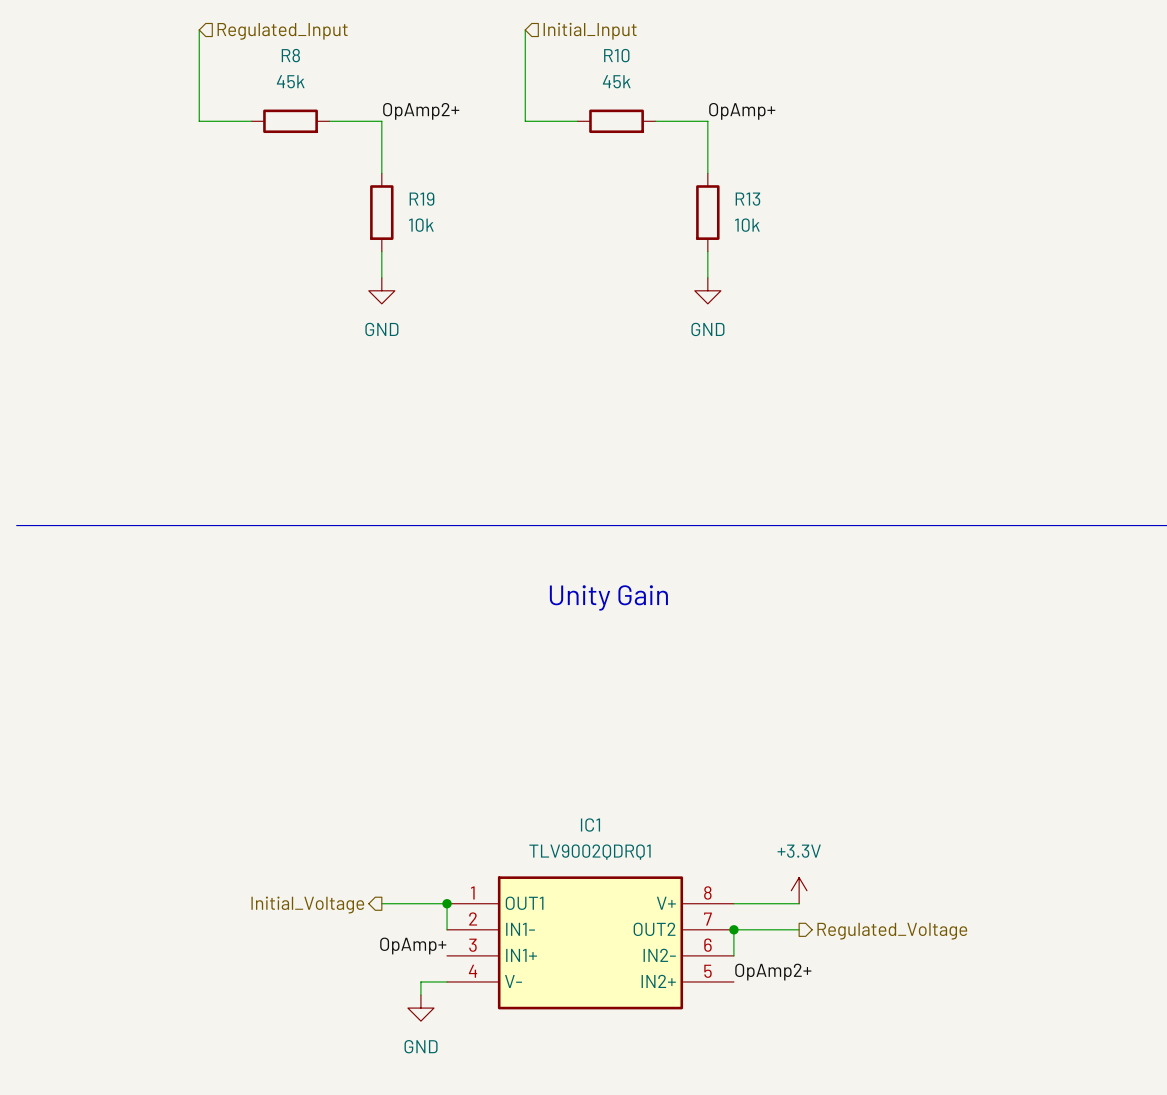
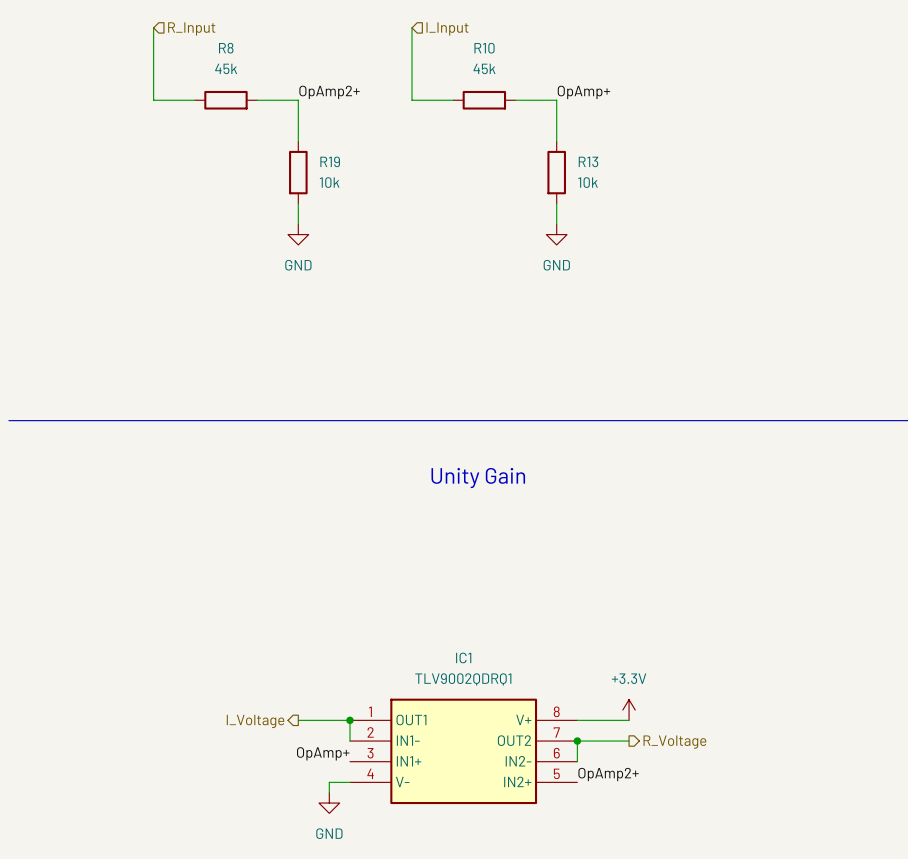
hierarchical label: Regulated_Input (282, 31) -> R_Input (191, 28)
hierarchical label: Initial_Input (590, 31) -> I_Input (447, 28)
hierarchical label: Initial_Voltage (307, 905) -> I_Voltage (255, 721)
hierarchical label: Regulated_Voltage (892, 931) -> R_Voltage (674, 742)

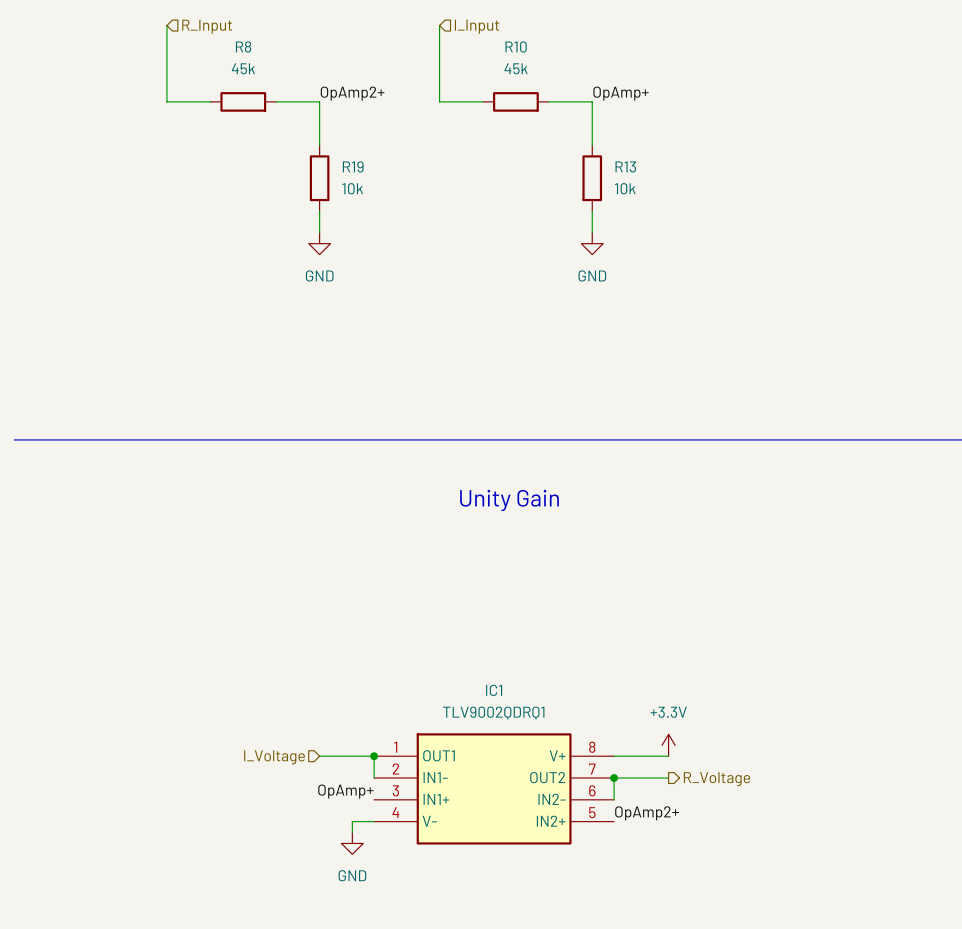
hierarchical label shape: output (255, 721) -> input (274, 757)

